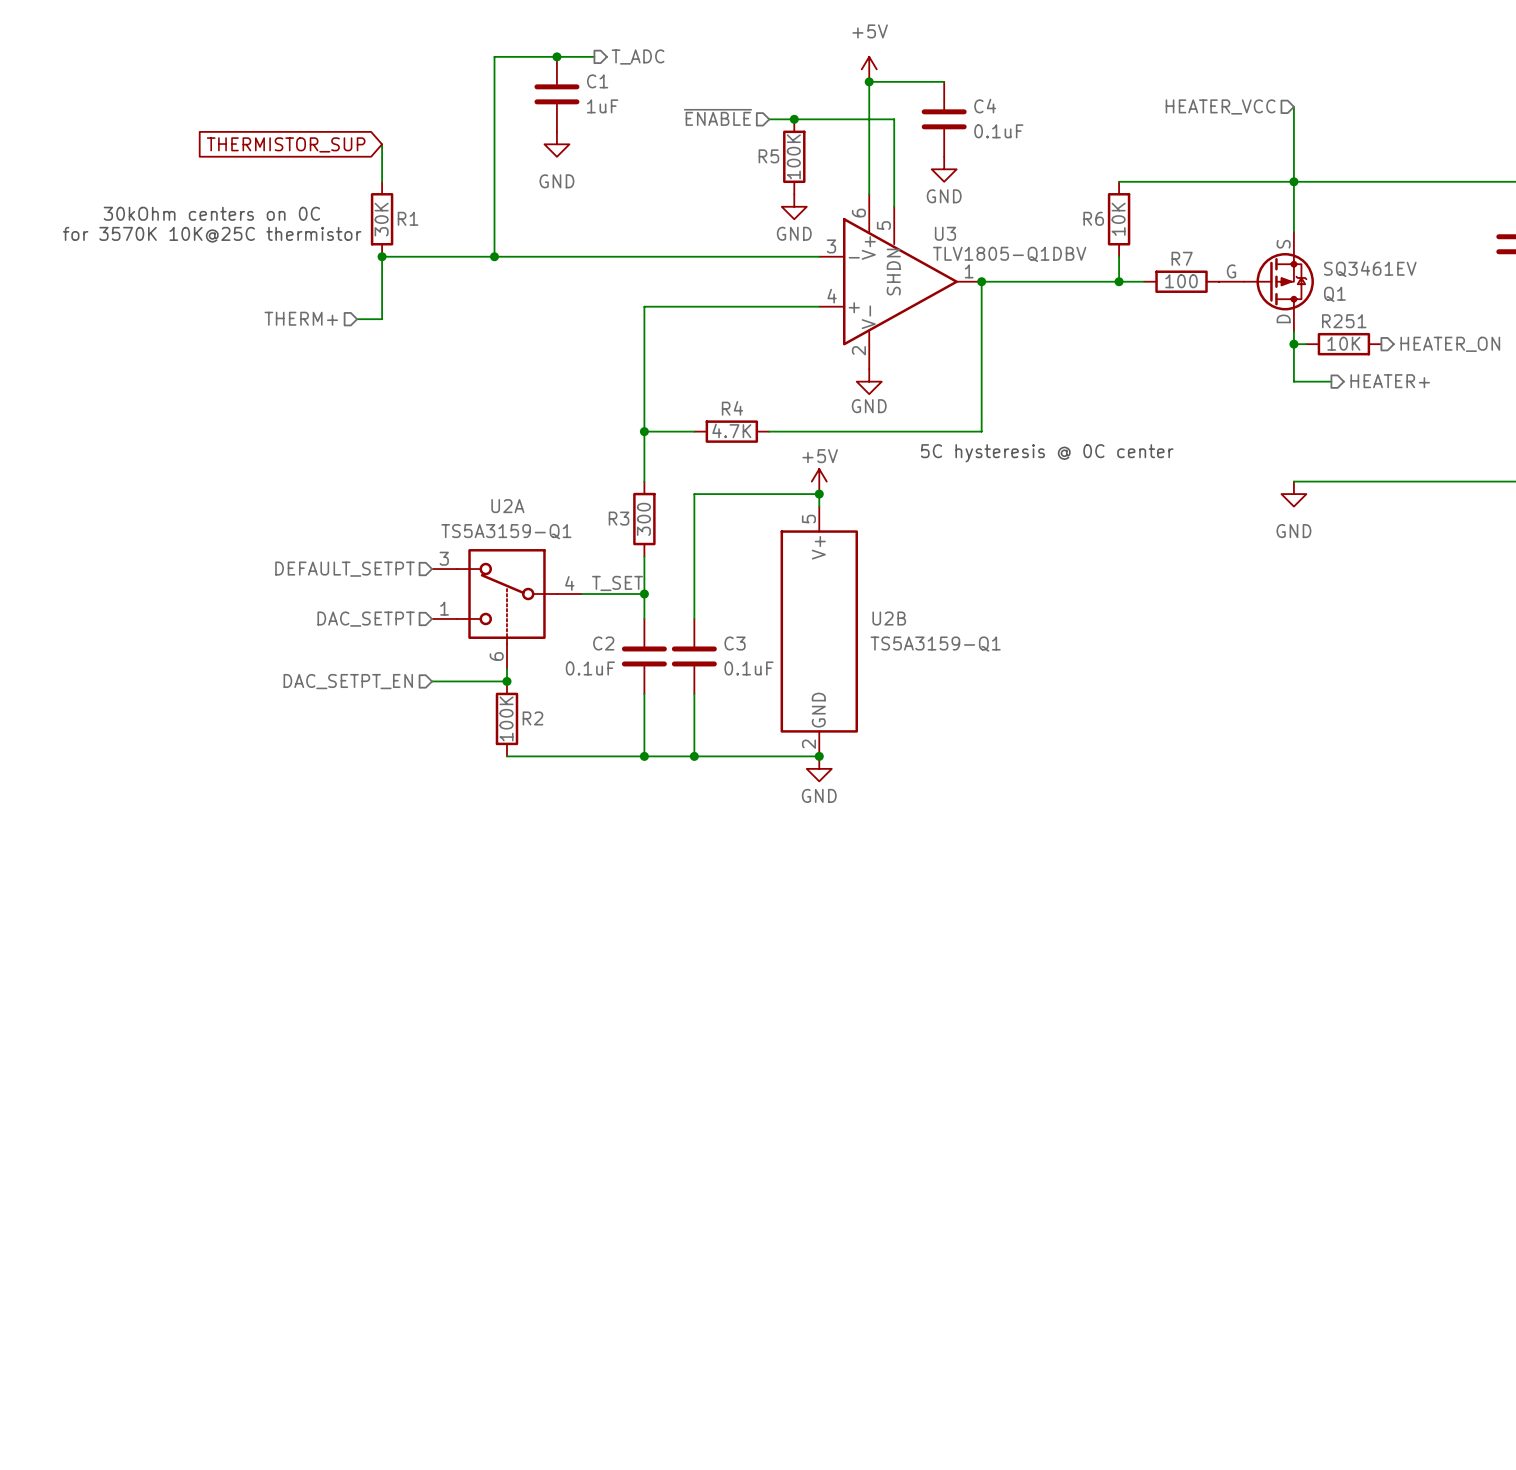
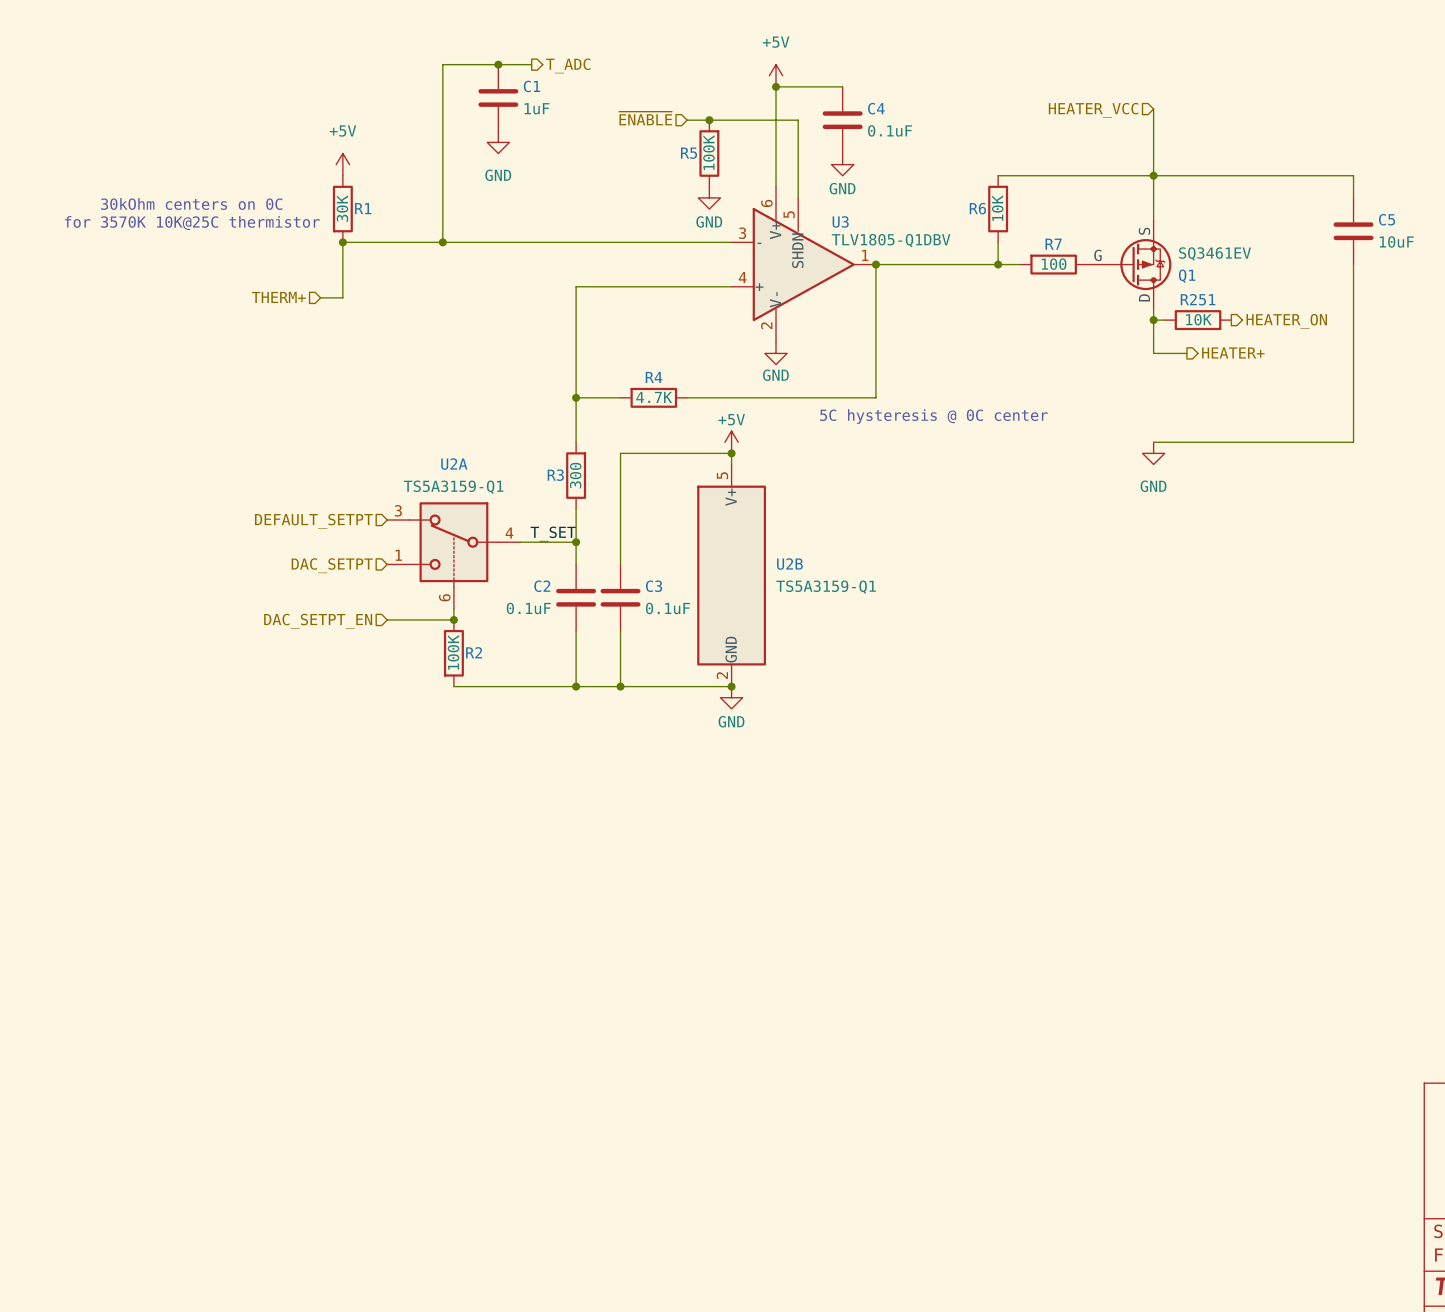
global label: THERMISTOR_SUP (286, 144) -> none
power symbol: none -> +5V (342, 164)

